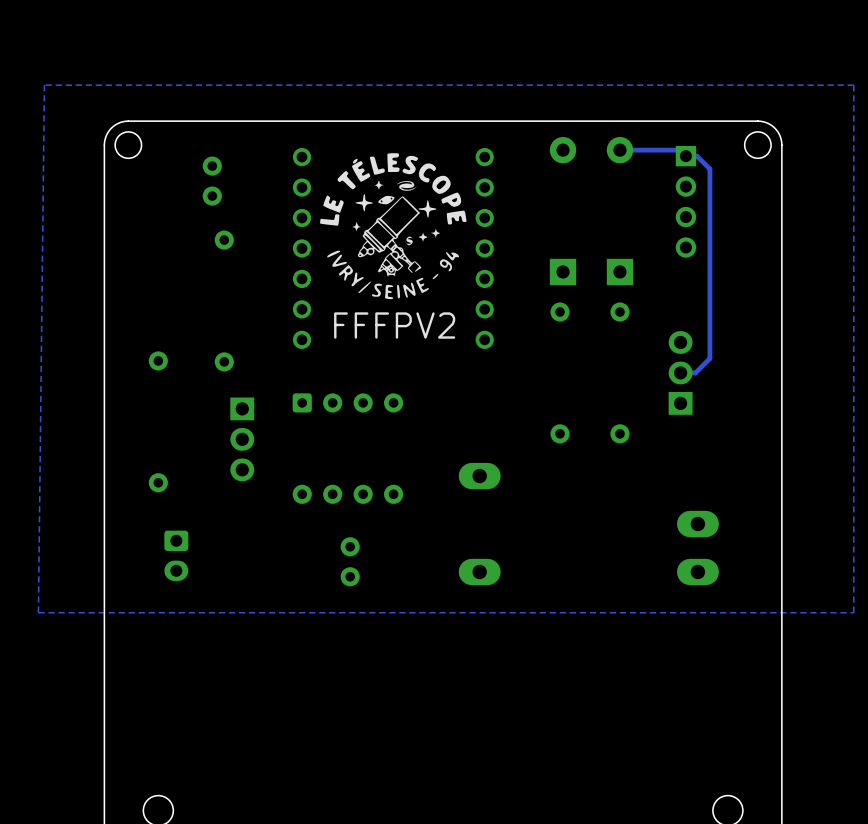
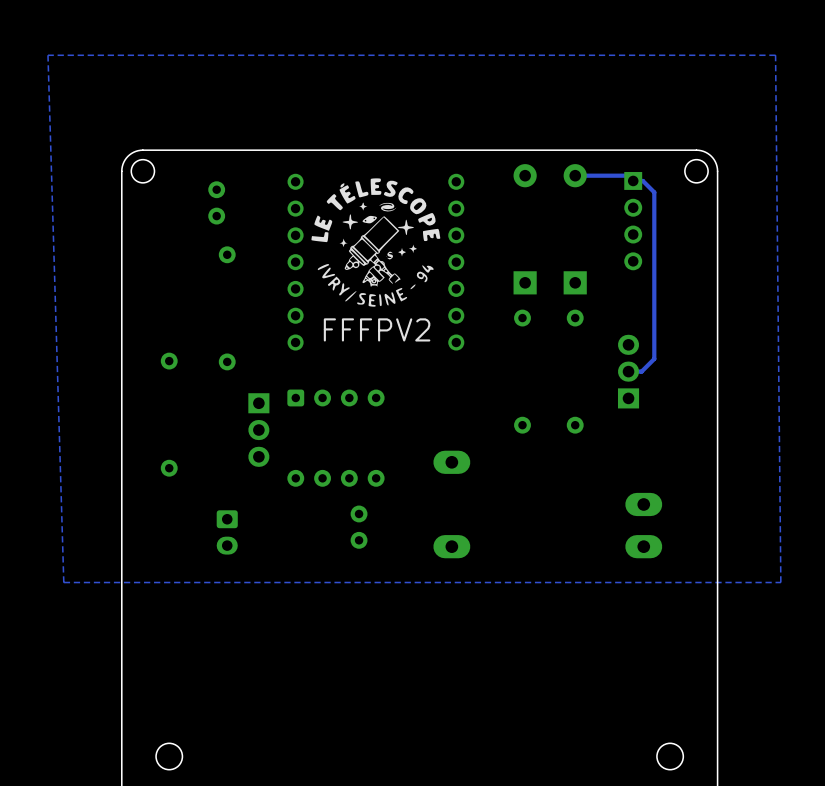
part position: (242, 439) -> (258, 430)
part position: (176, 555) -> (227, 532)
part position: (350, 561) -> (359, 527)
zone outline: (853, 612) (853, 85) (44, 85) (38, 612) -> (780, 582) (775, 55) (47, 55) (63, 582)

